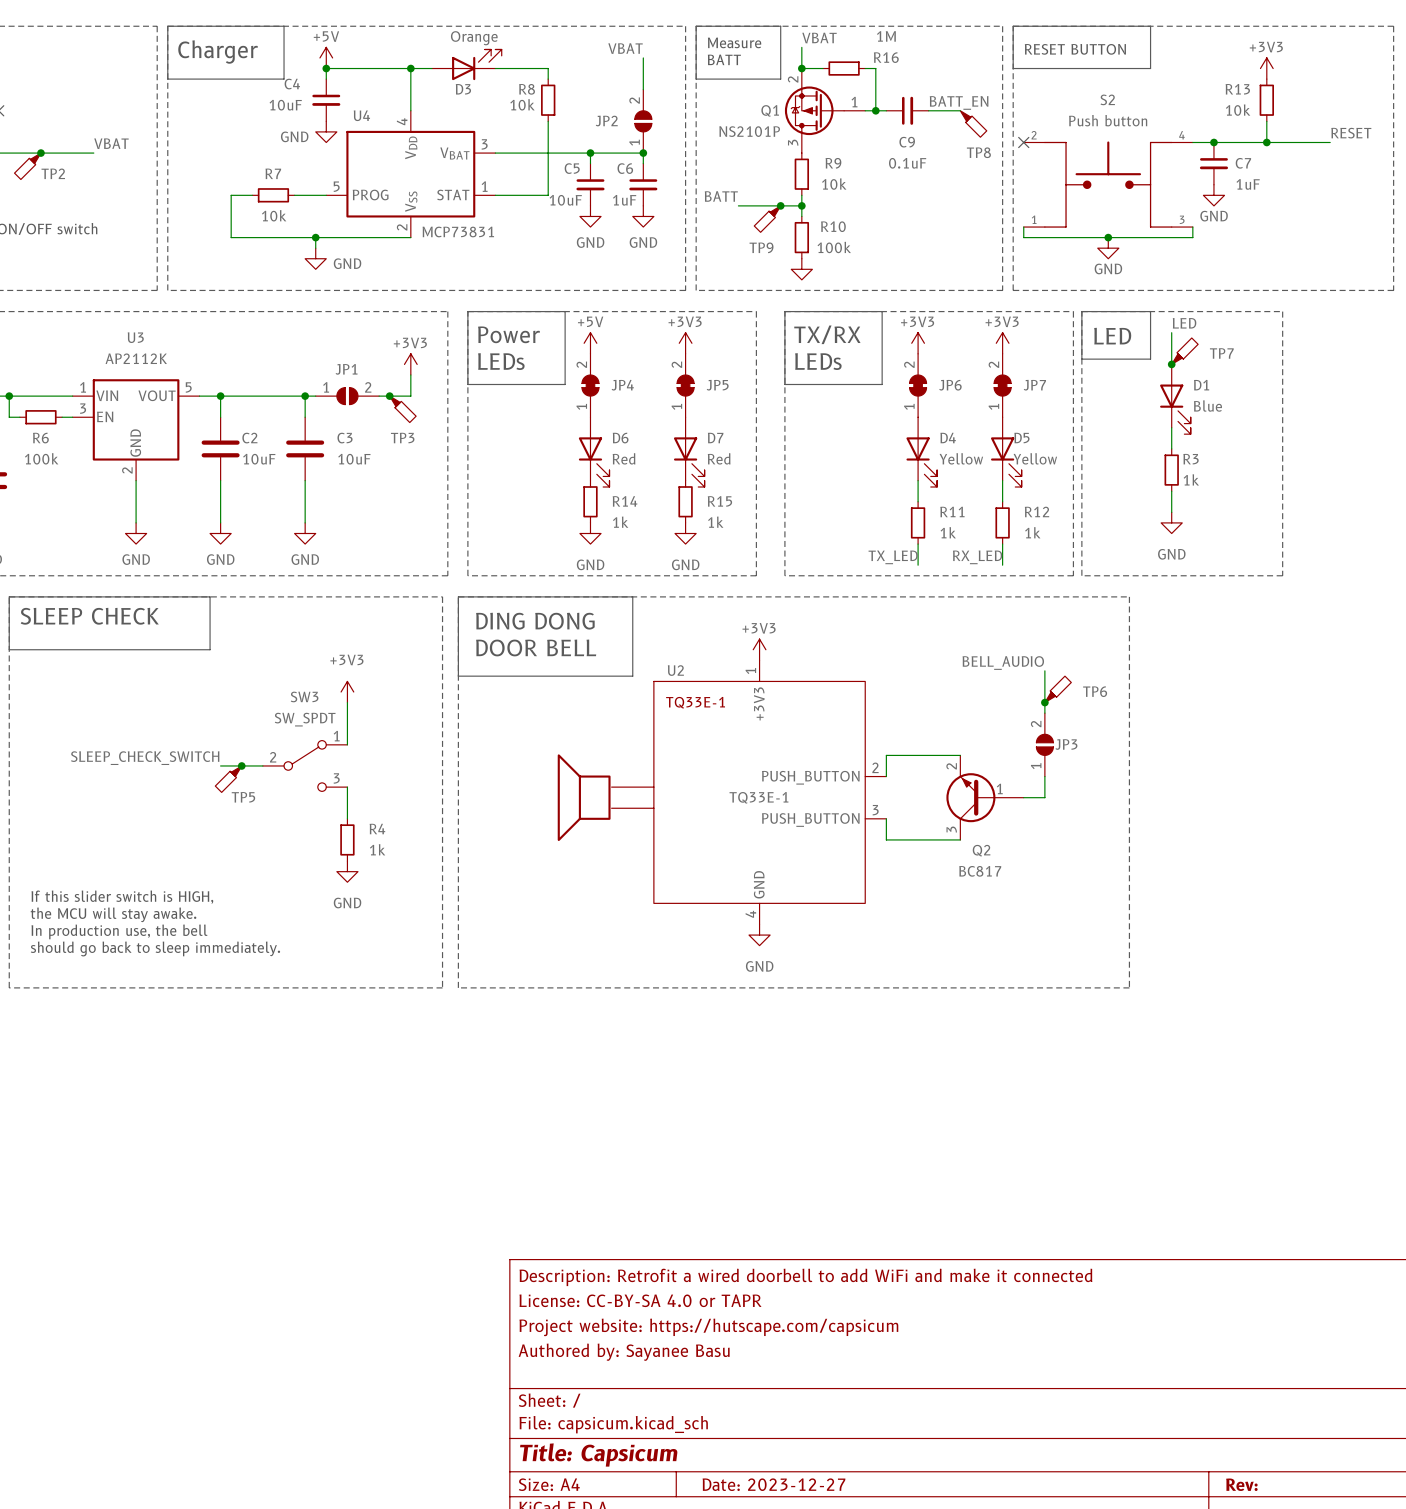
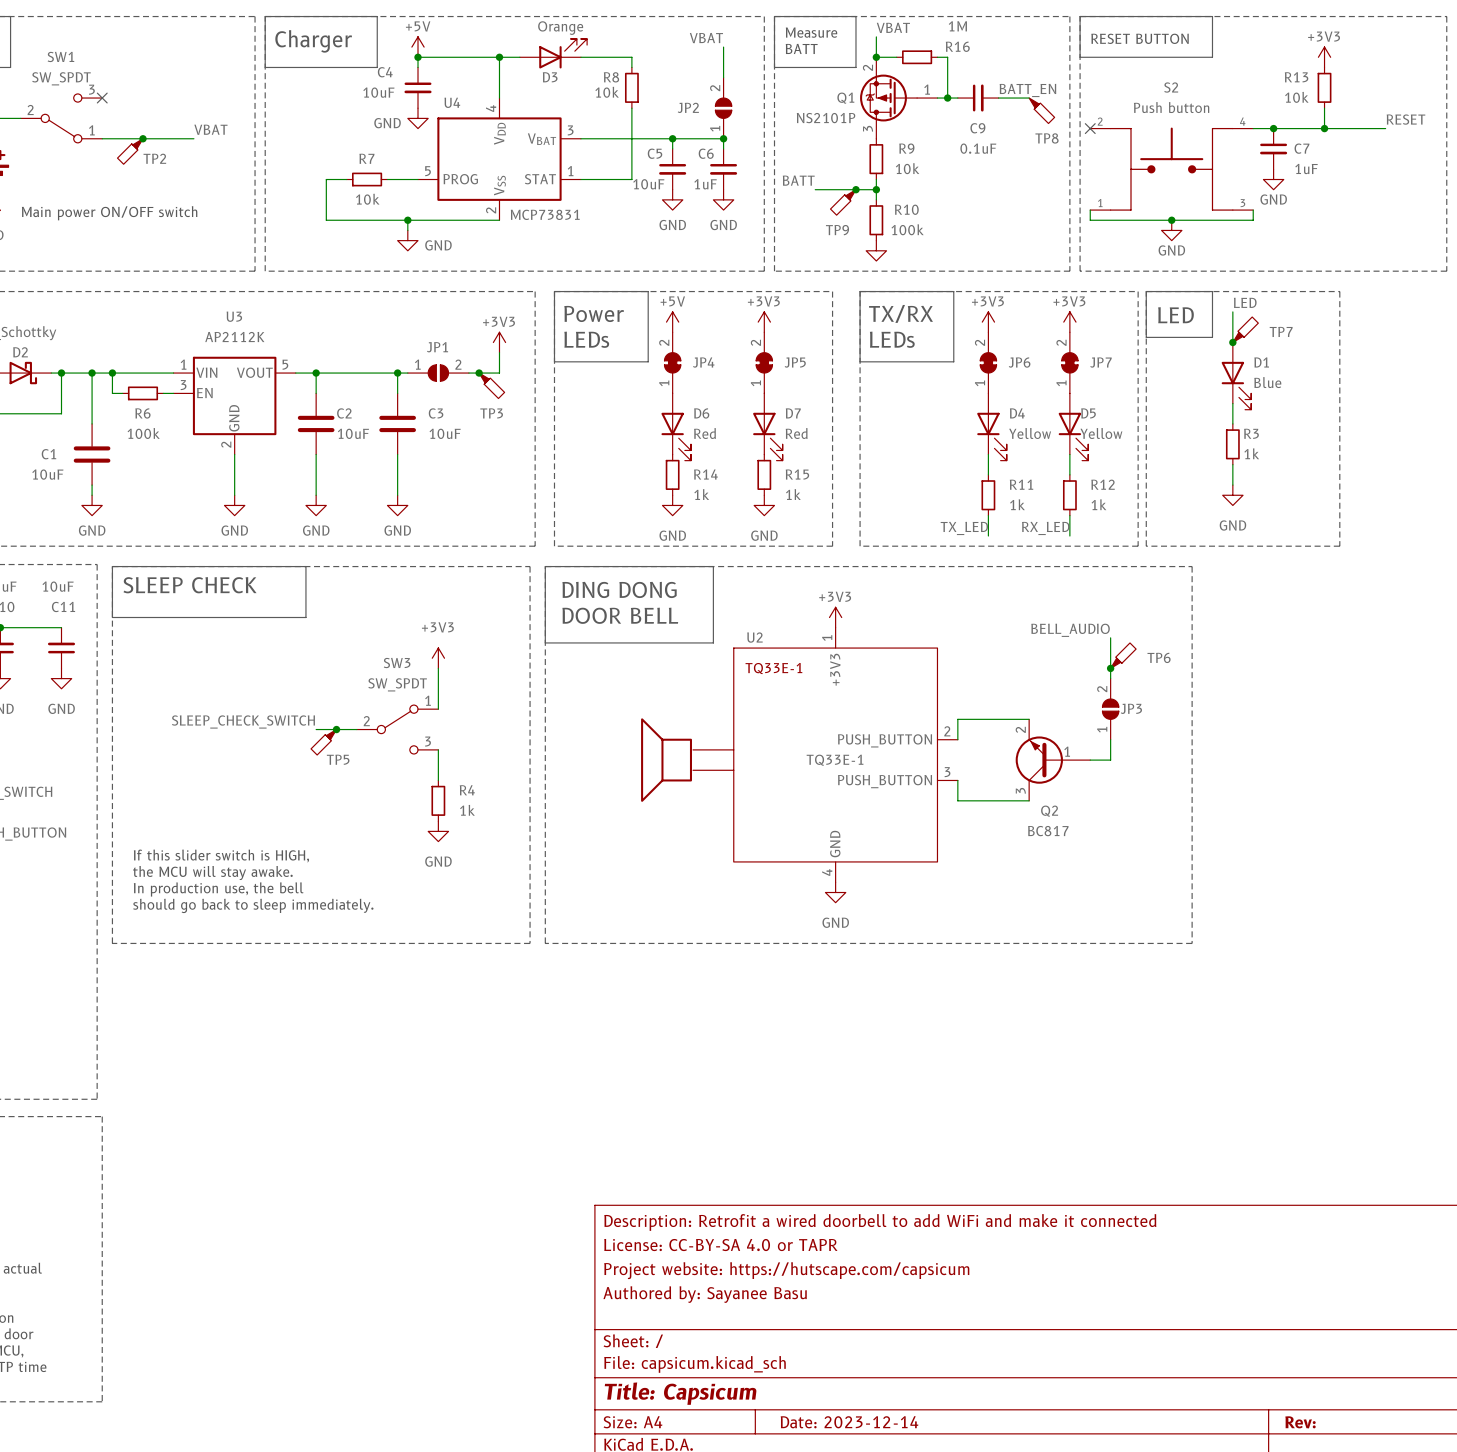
title block: Date: 2023-12-27 (773, 1484) -> Date: 2023-12-14 (849, 1422)

